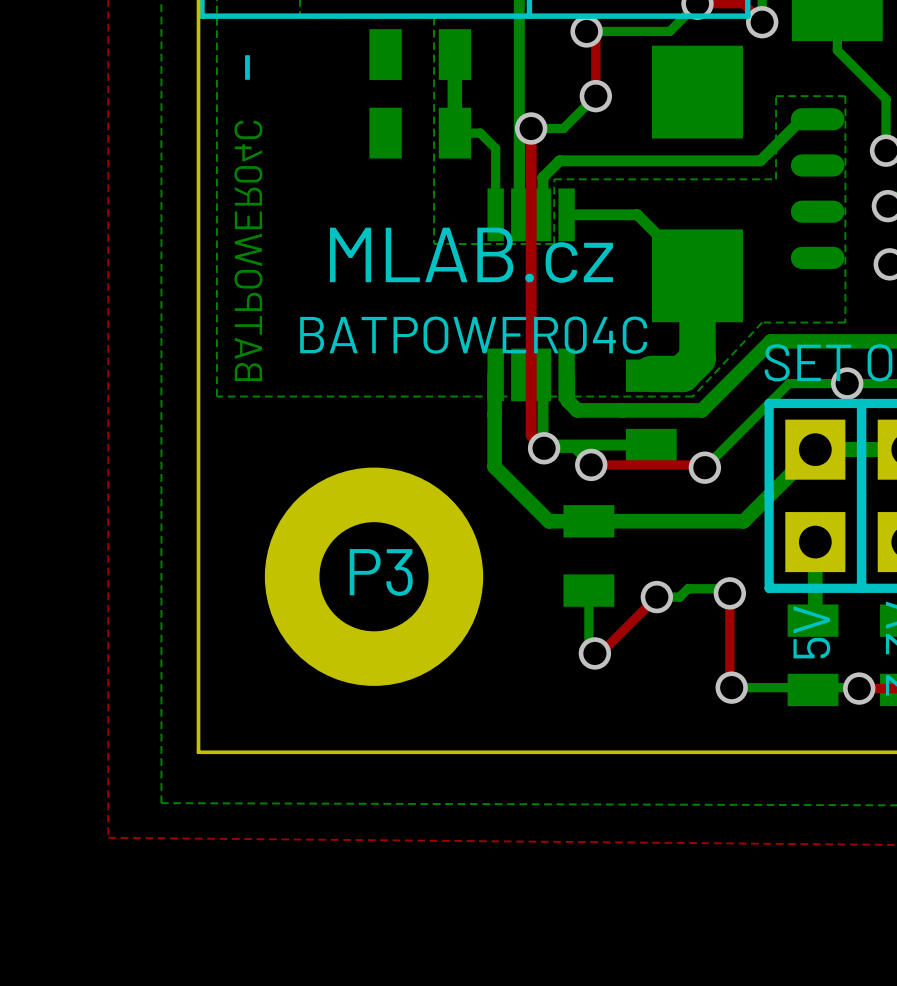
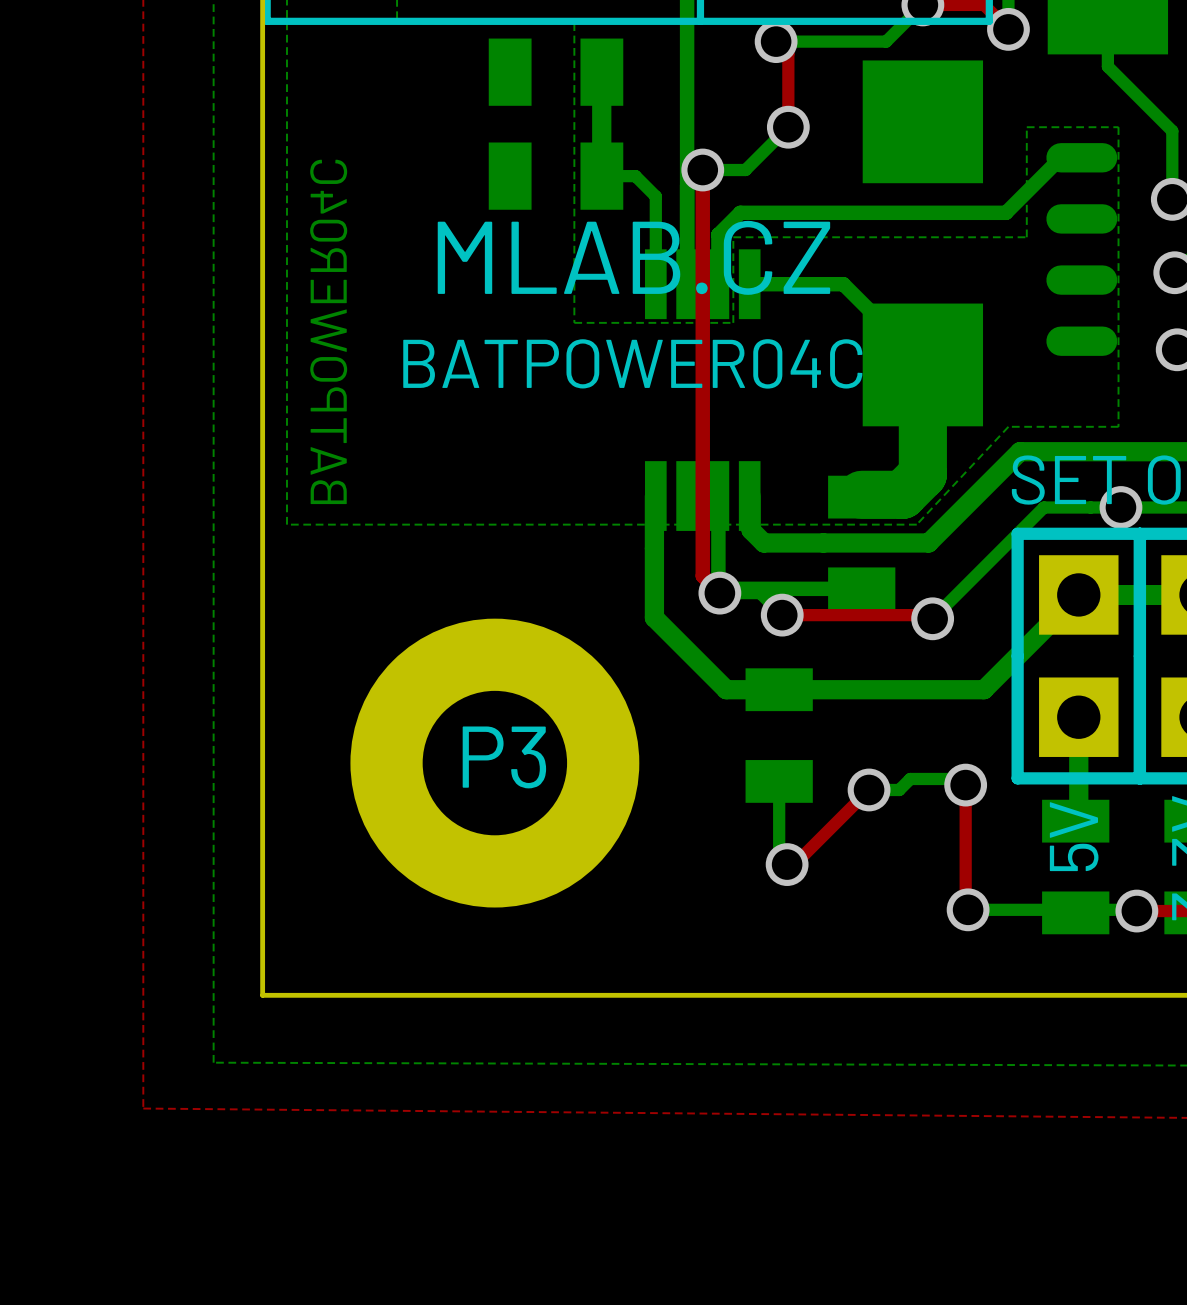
text: - (247, 67) -> none
text: none -> MLAB.CZ (633, 257)
text: MLAB.cz (471, 255) -> BATPOWER04C (632, 363)
text: BATPOWER04C (473, 335) -> none

